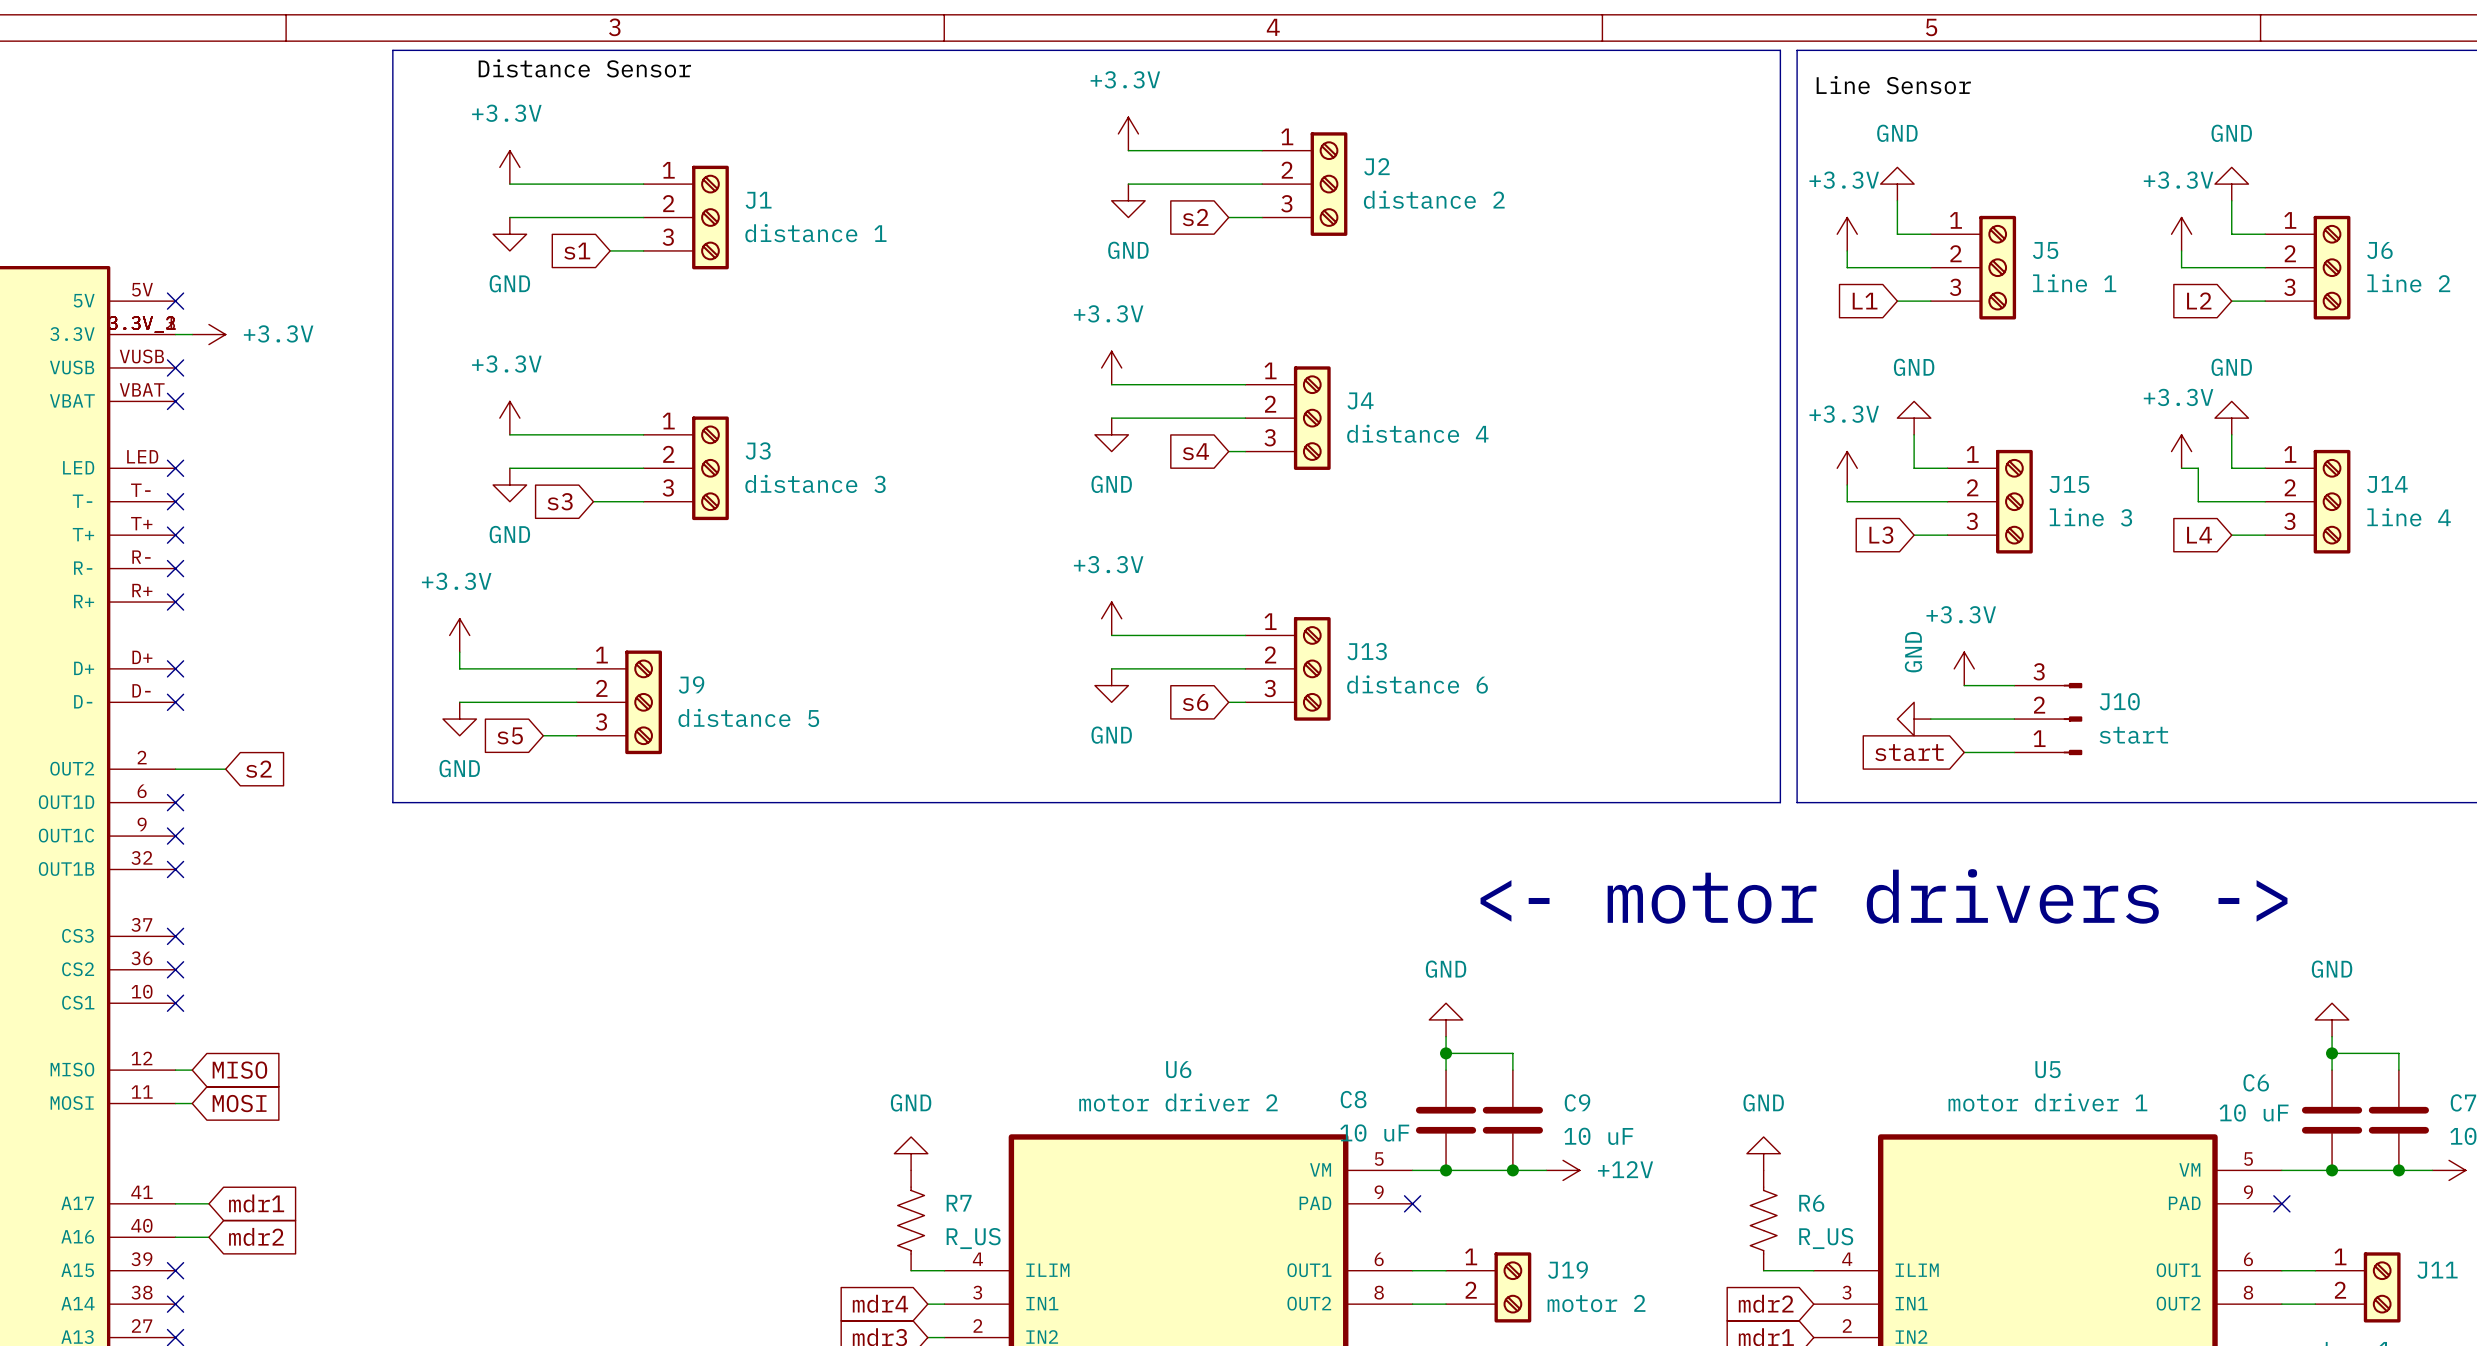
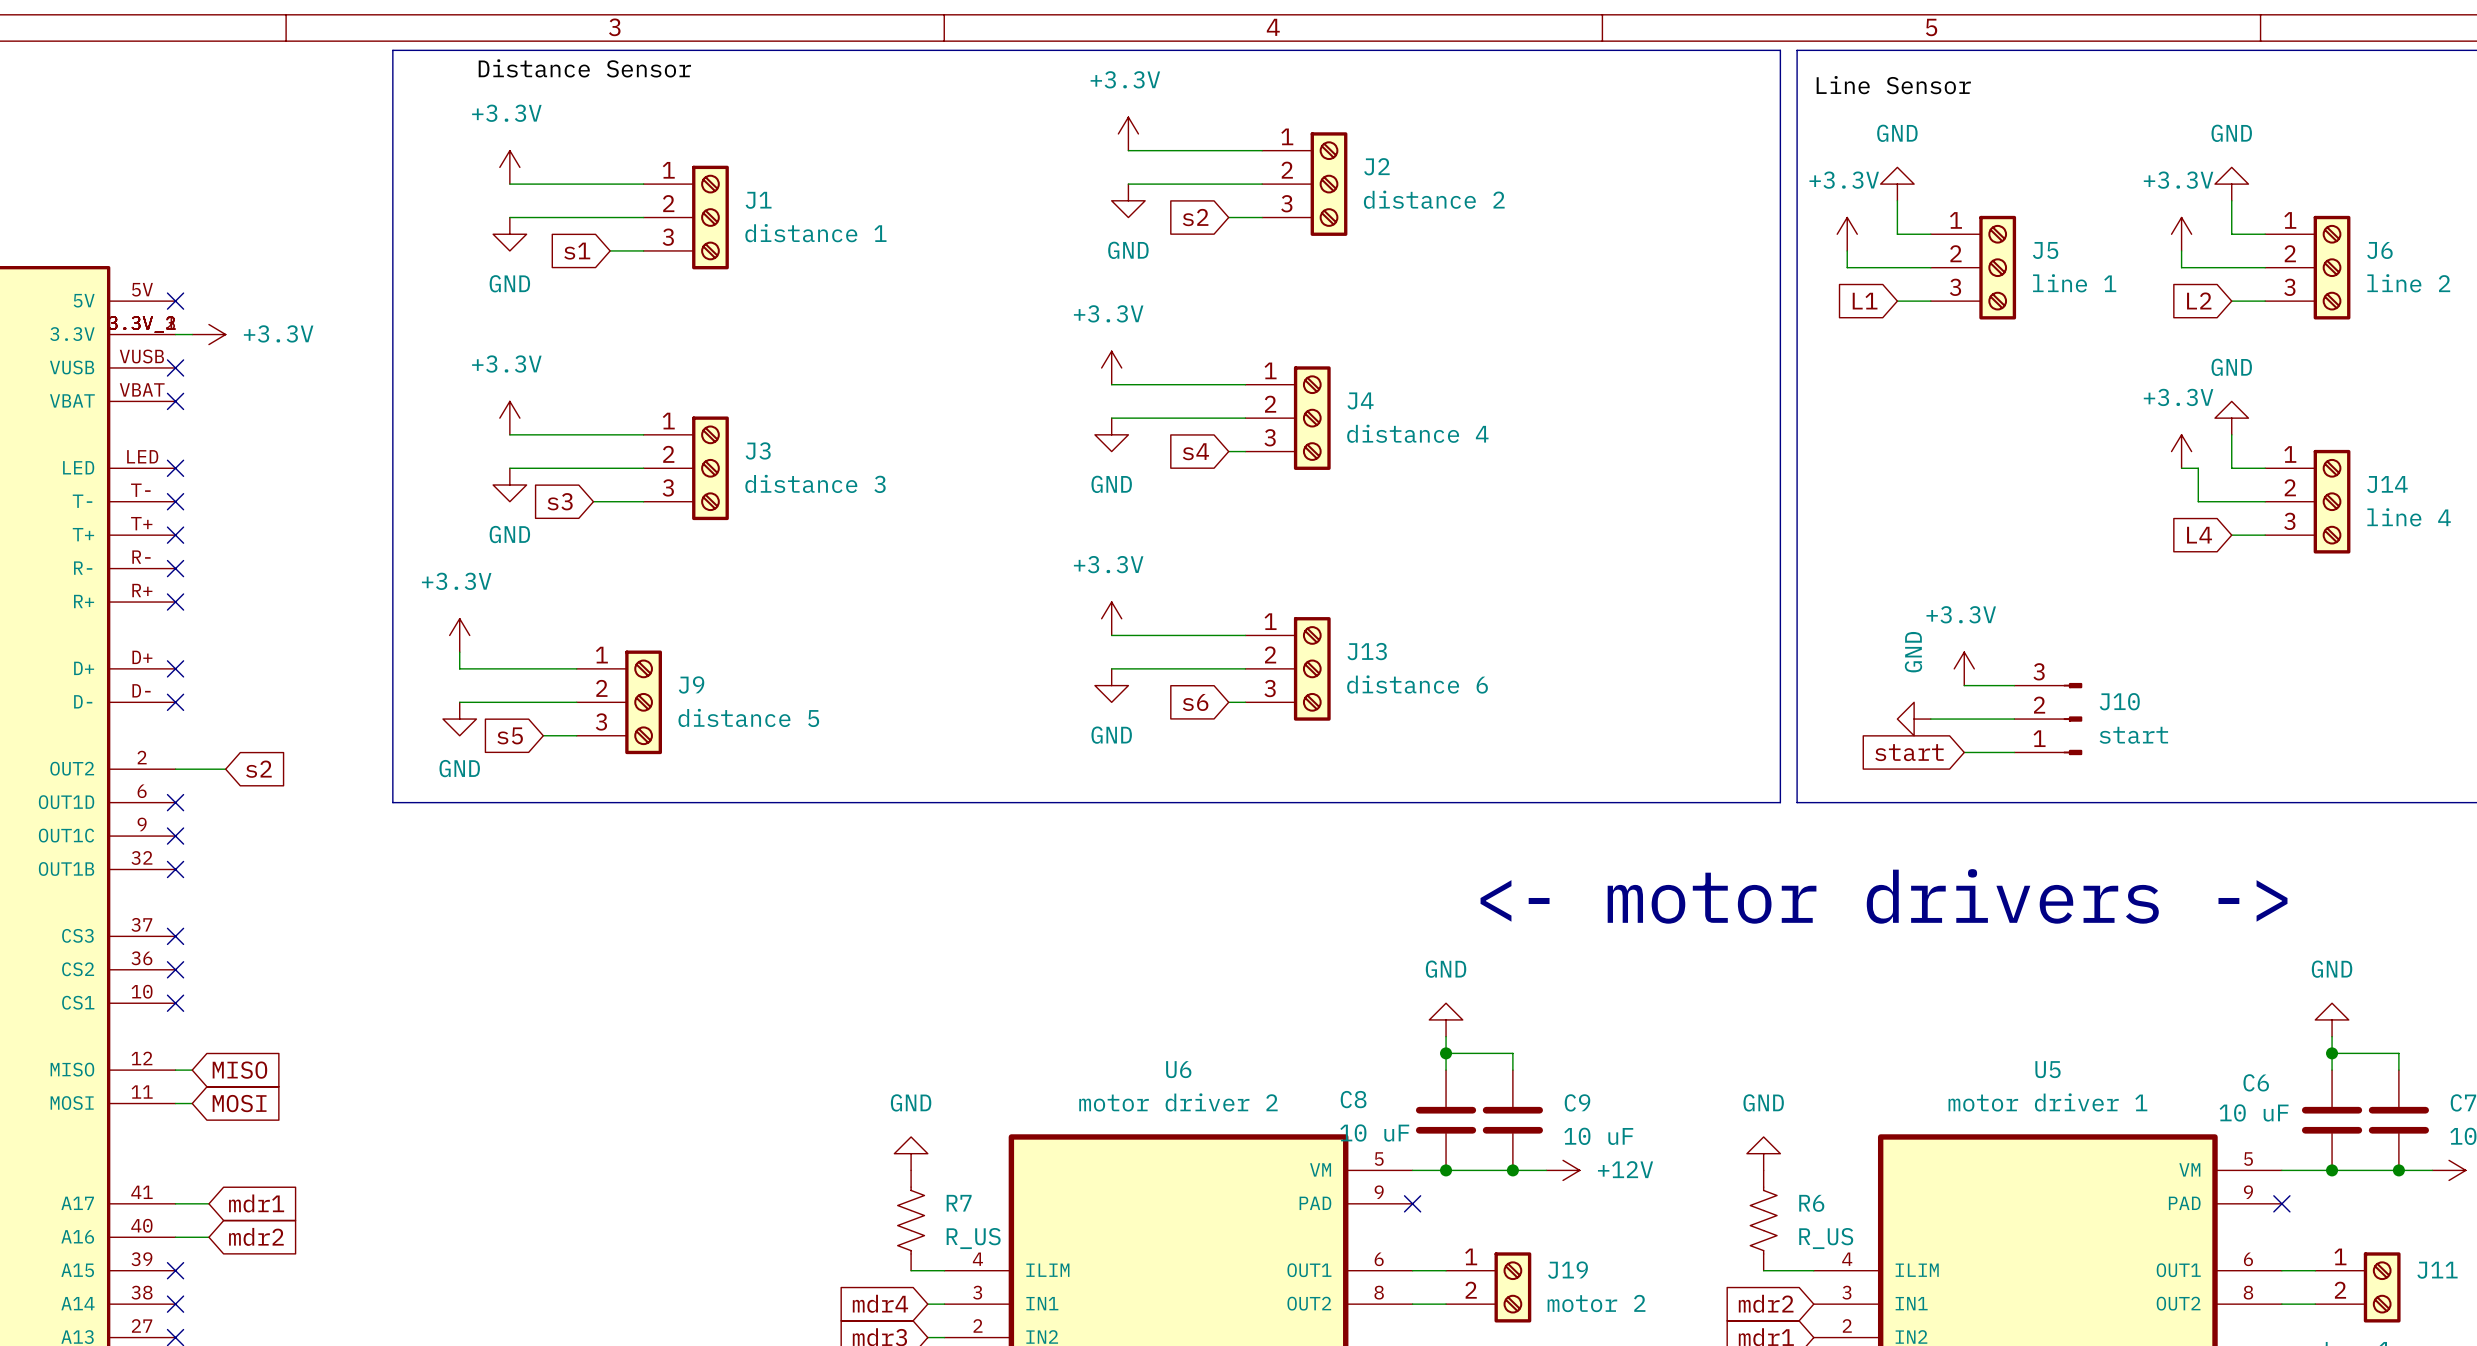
power symbol: GND (1914, 418) -> none
wire: (1914, 434) (1914, 468) (1947, 468) -> none
power symbol: +3.3V (1847, 468) -> none
wire: (1847, 485) (1847, 501) (1947, 501) -> none
J15: line 3 (1990, 501) -> none
global label: L3 (1881, 535) -> none
wire: (1914, 535) (1947, 535) -> none

